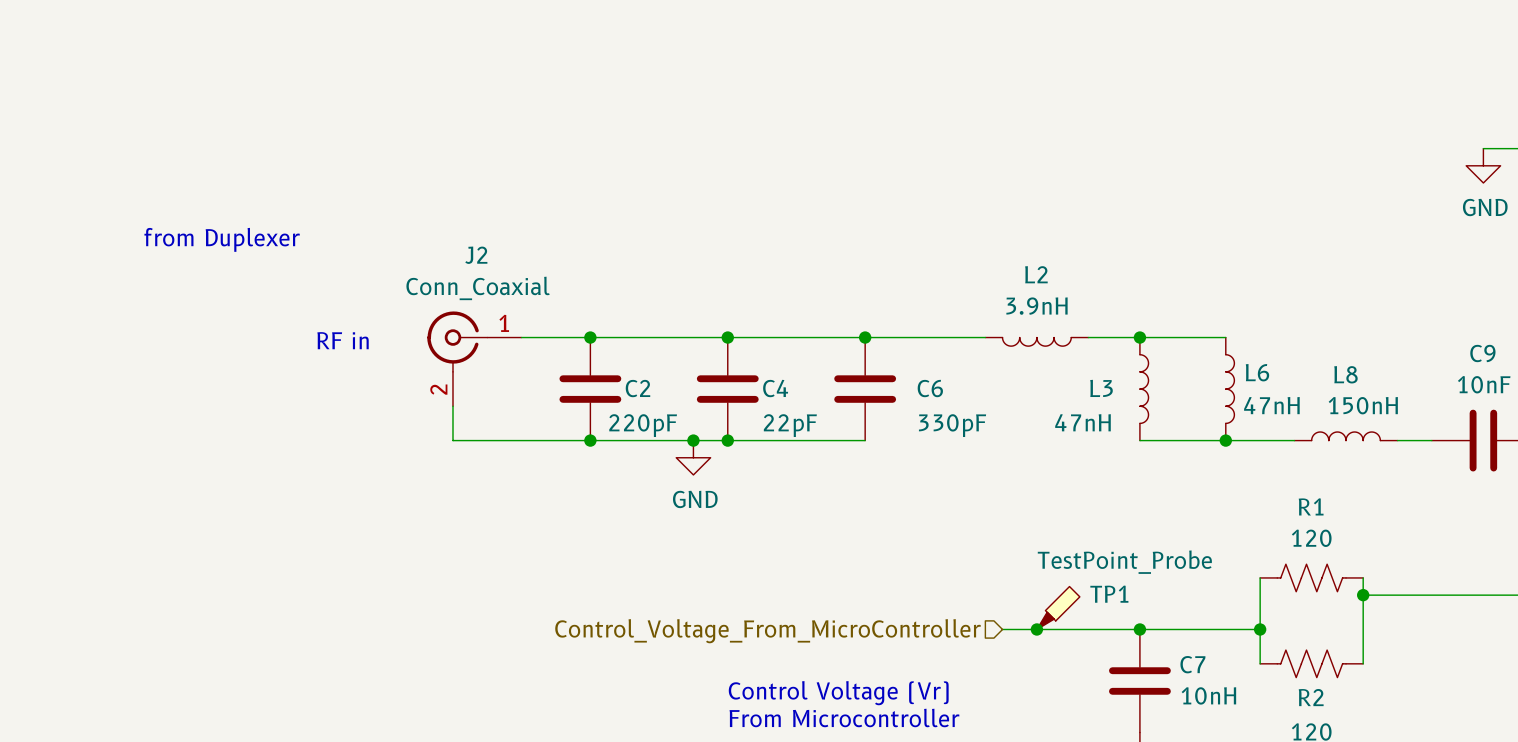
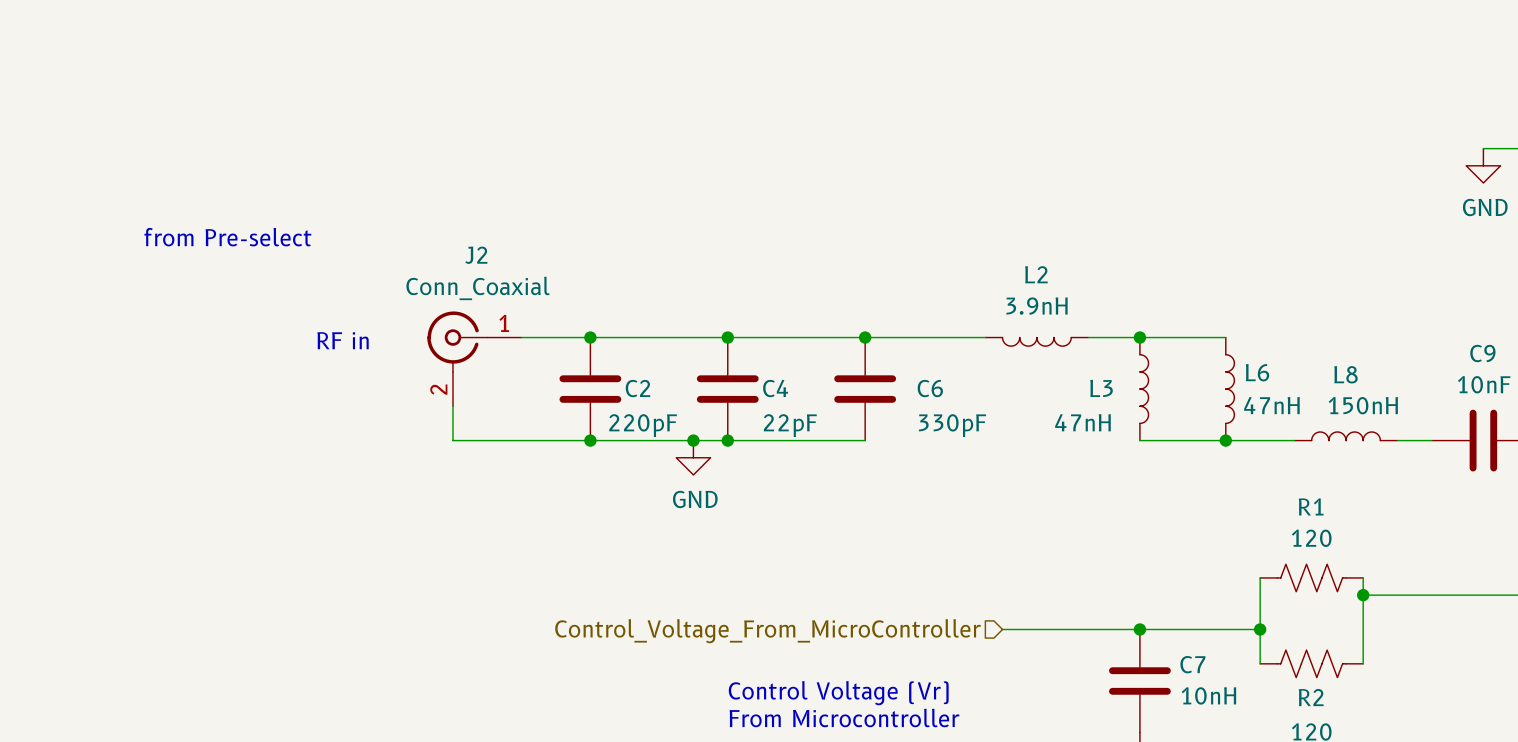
text: from Duplexer (222, 239) -> from Pre-select (227, 237)
TP1: TestPoint_Probe (1058, 608) -> none
junction: (1036, 629) -> none

